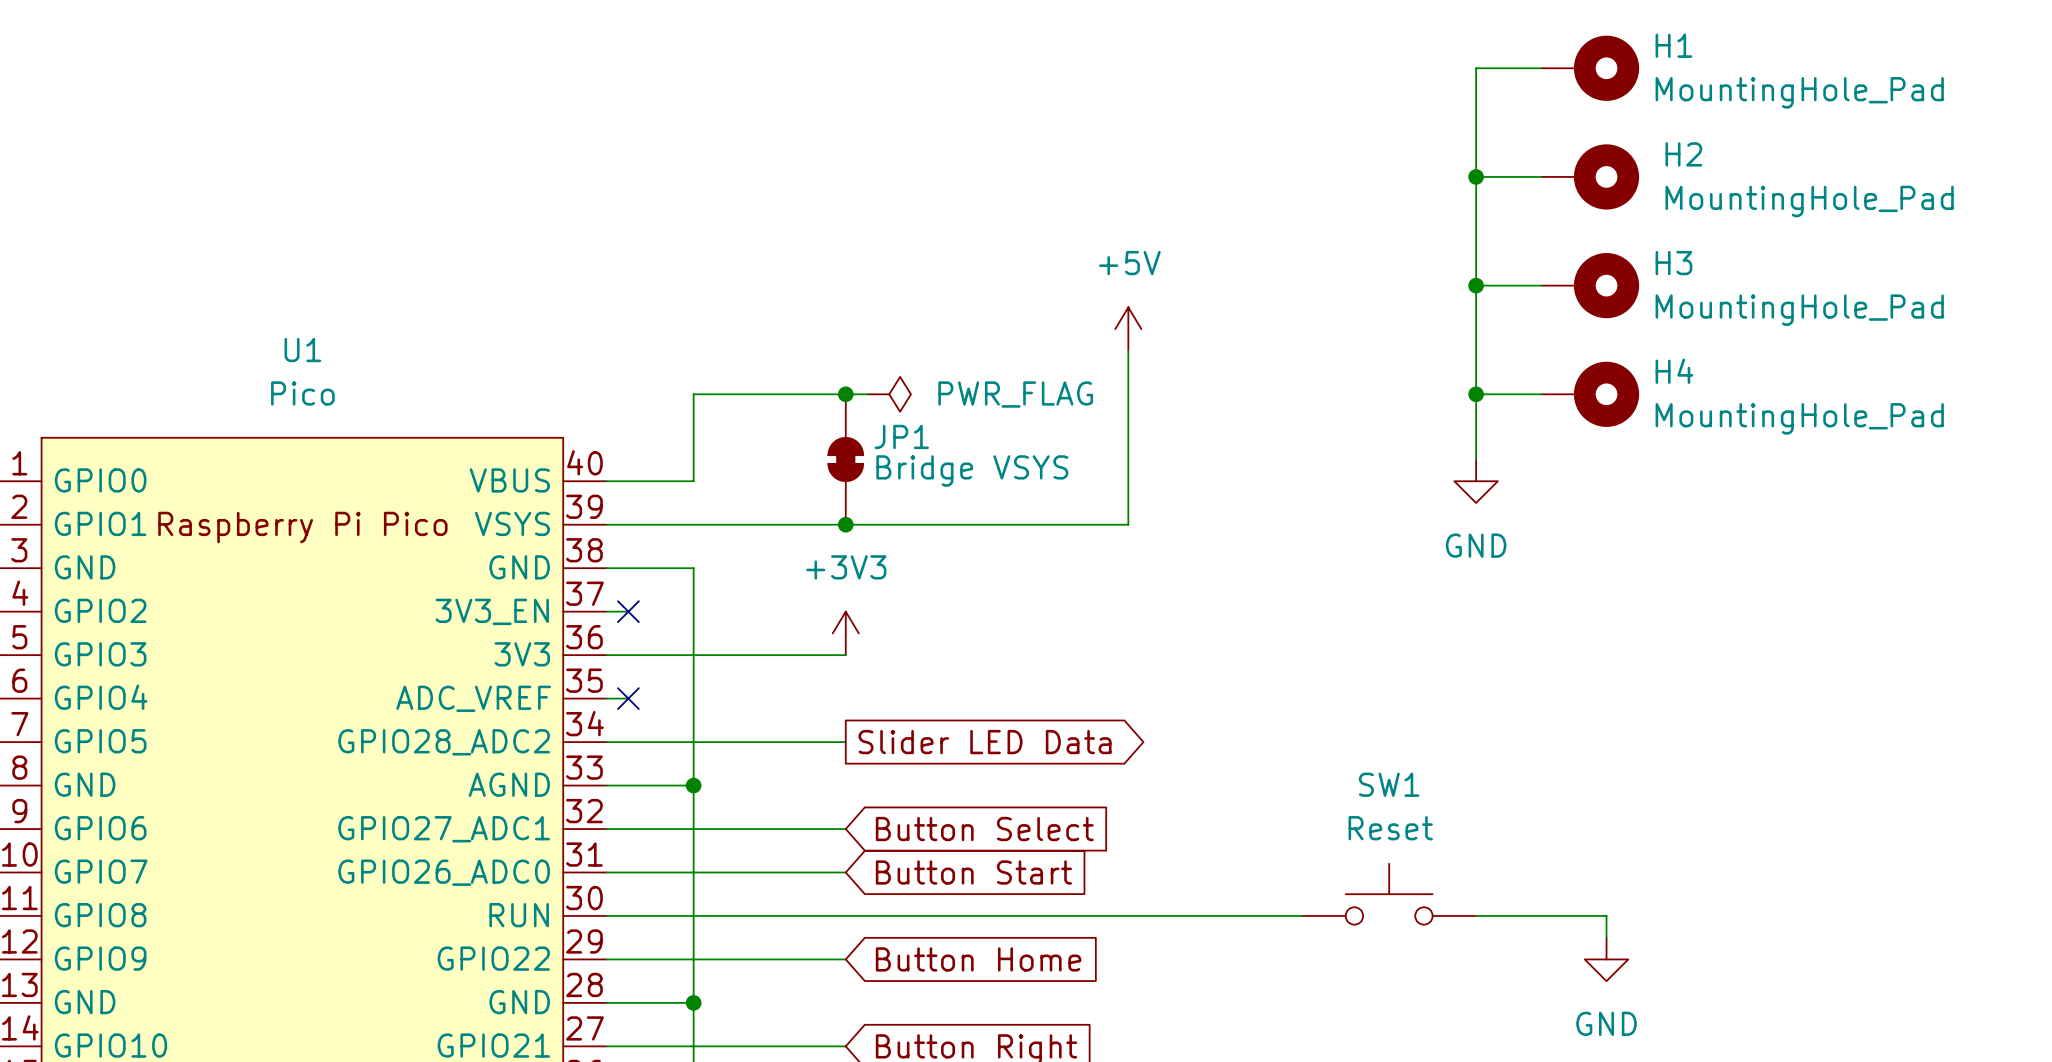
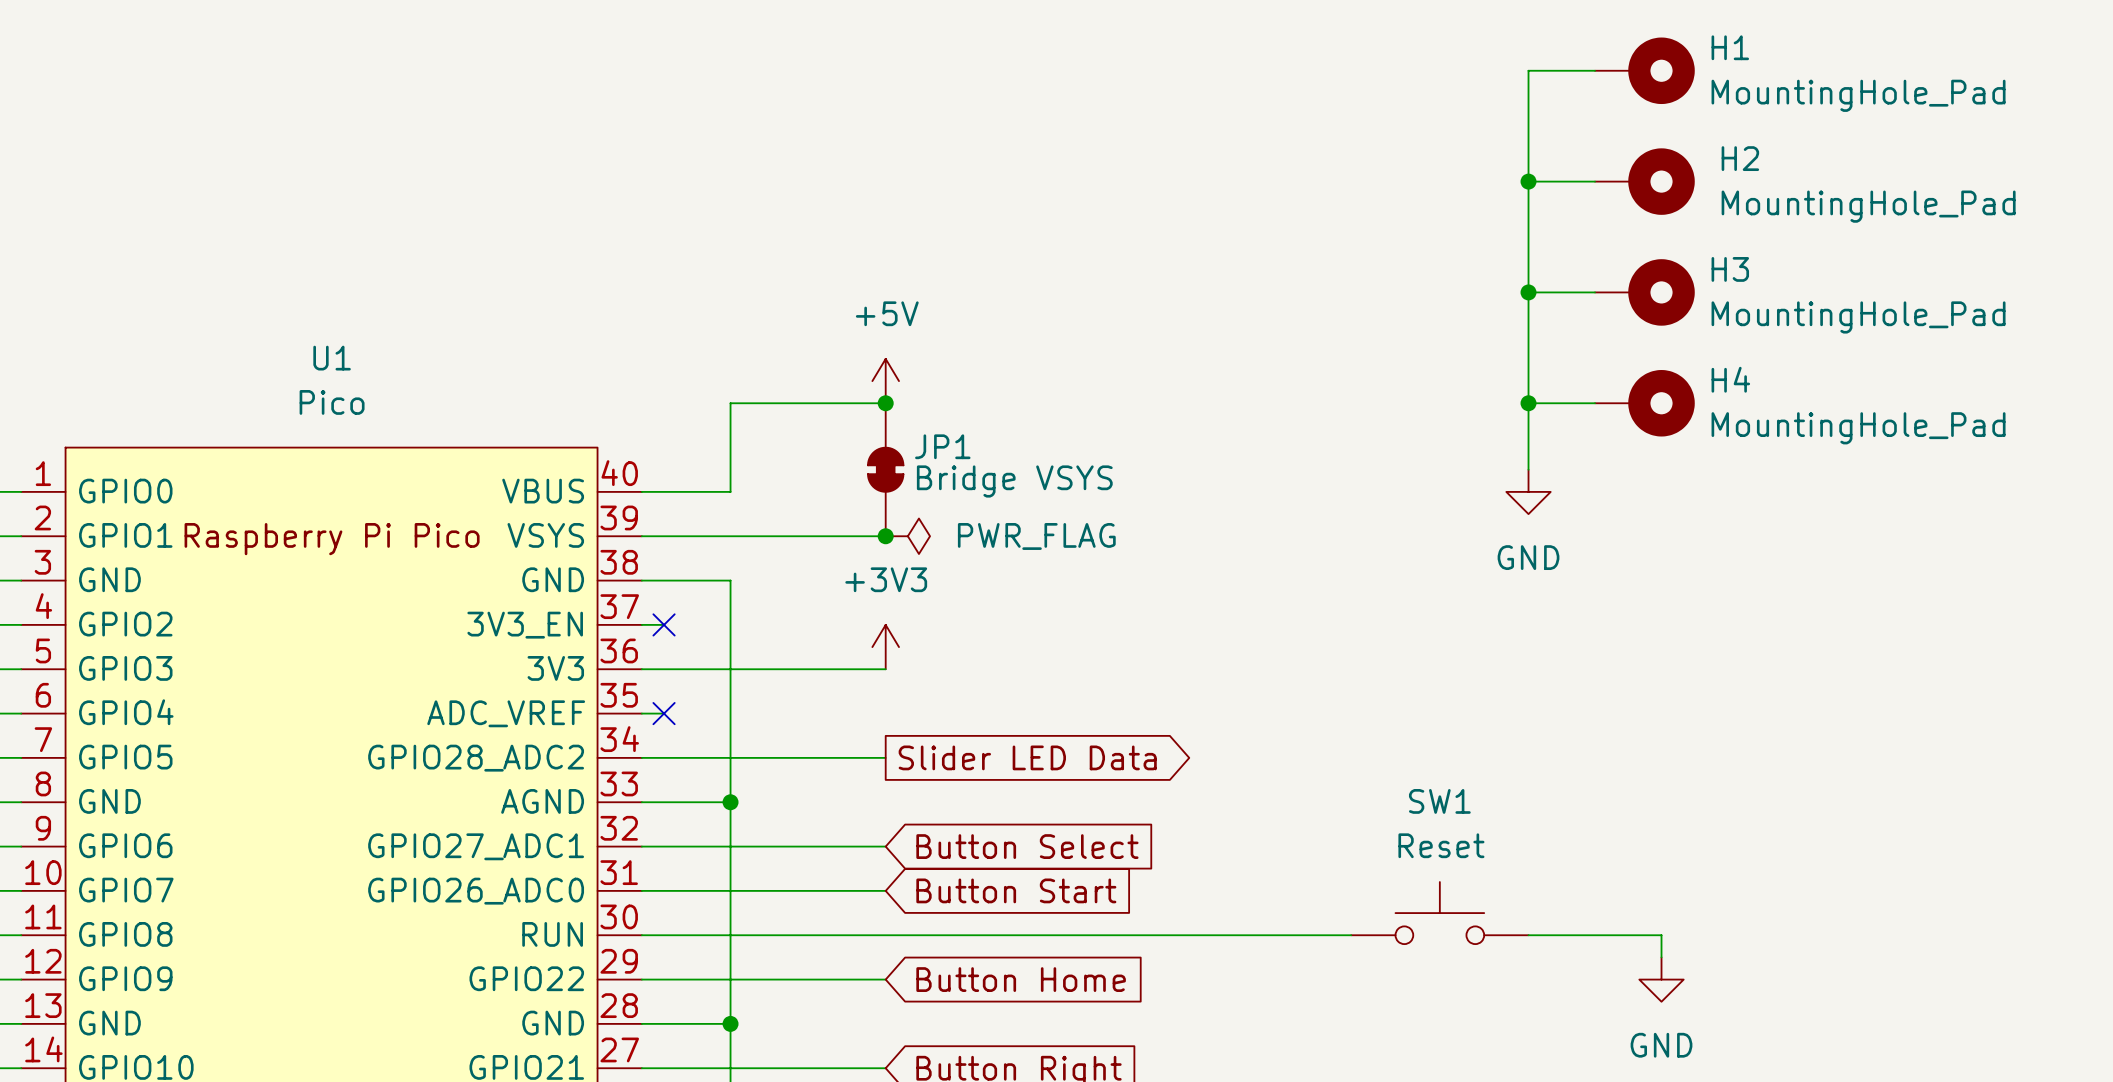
power symbol position: +5V (1128, 329) -> +5V (885, 381)
wire: (1128, 350) (1128, 524) (845, 524) -> none
wire: (845, 394) (867, 394) -> none
power symbol position: PWR_FLAG (889, 394) -> PWR_FLAG (907, 536)

